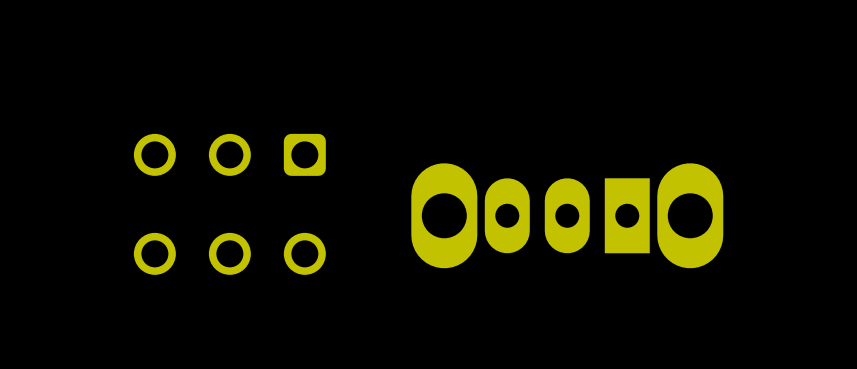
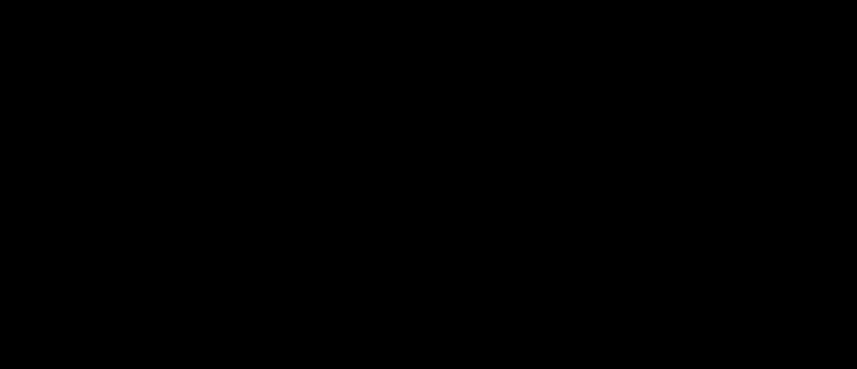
part: (229, 204) -> none
part: (567, 215) -> none

